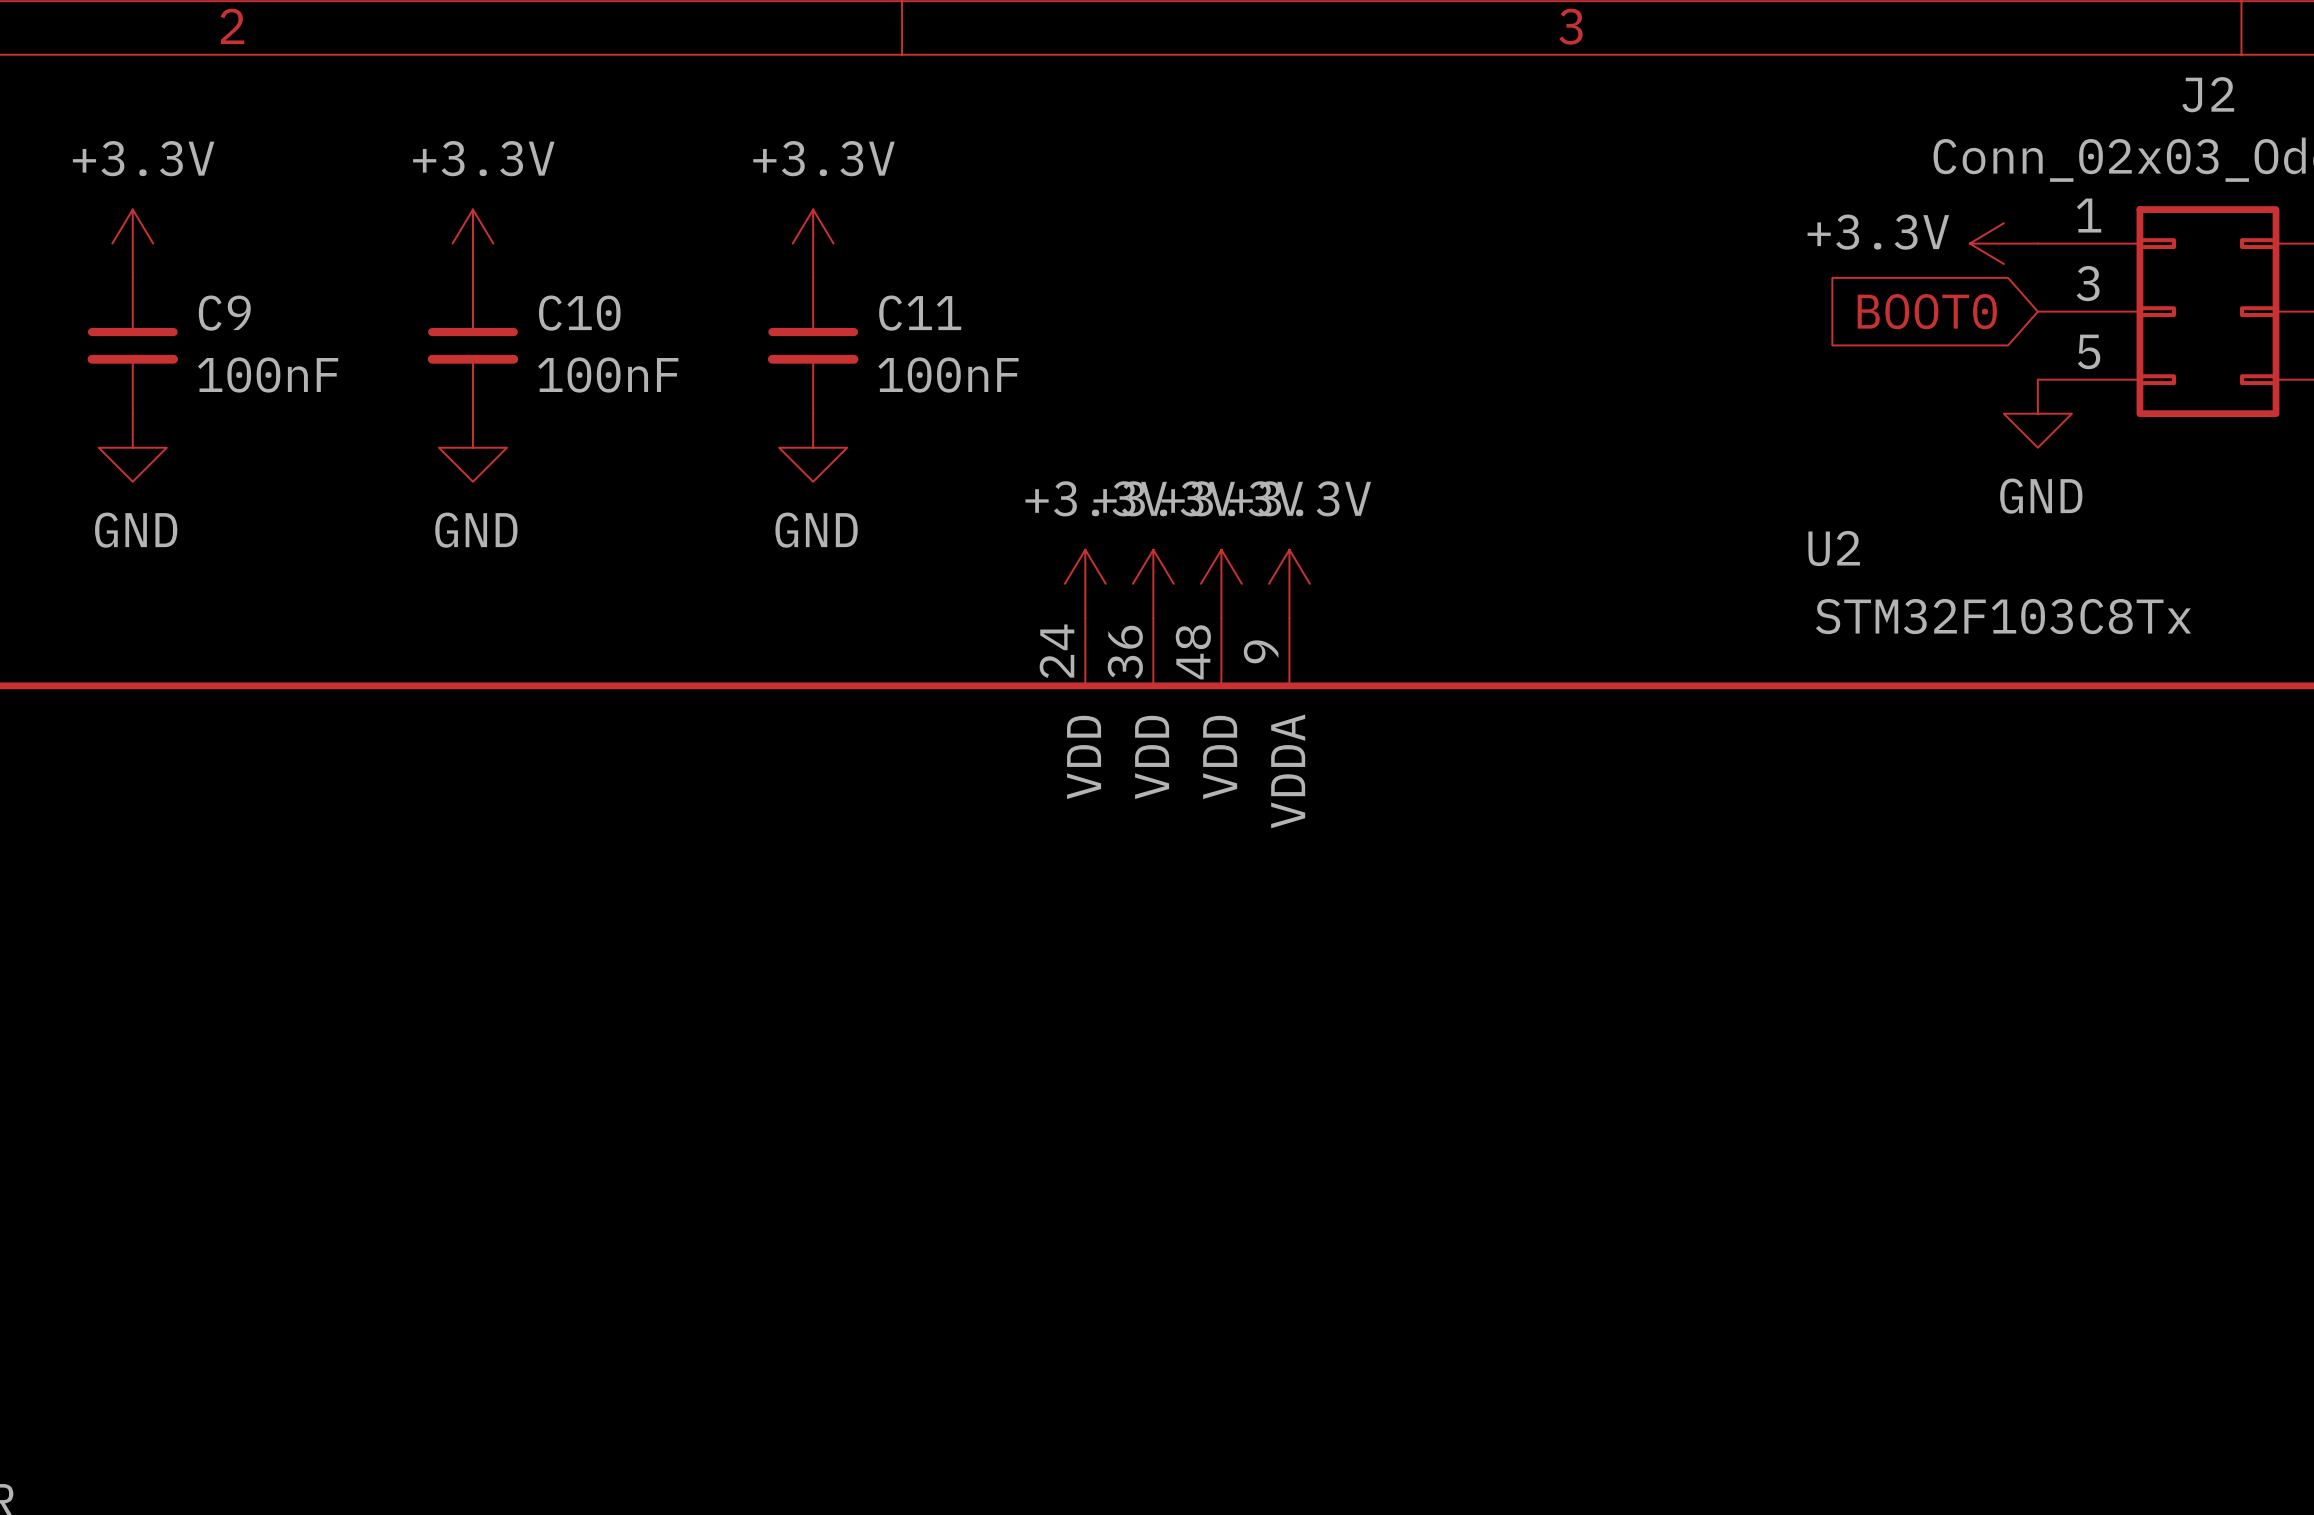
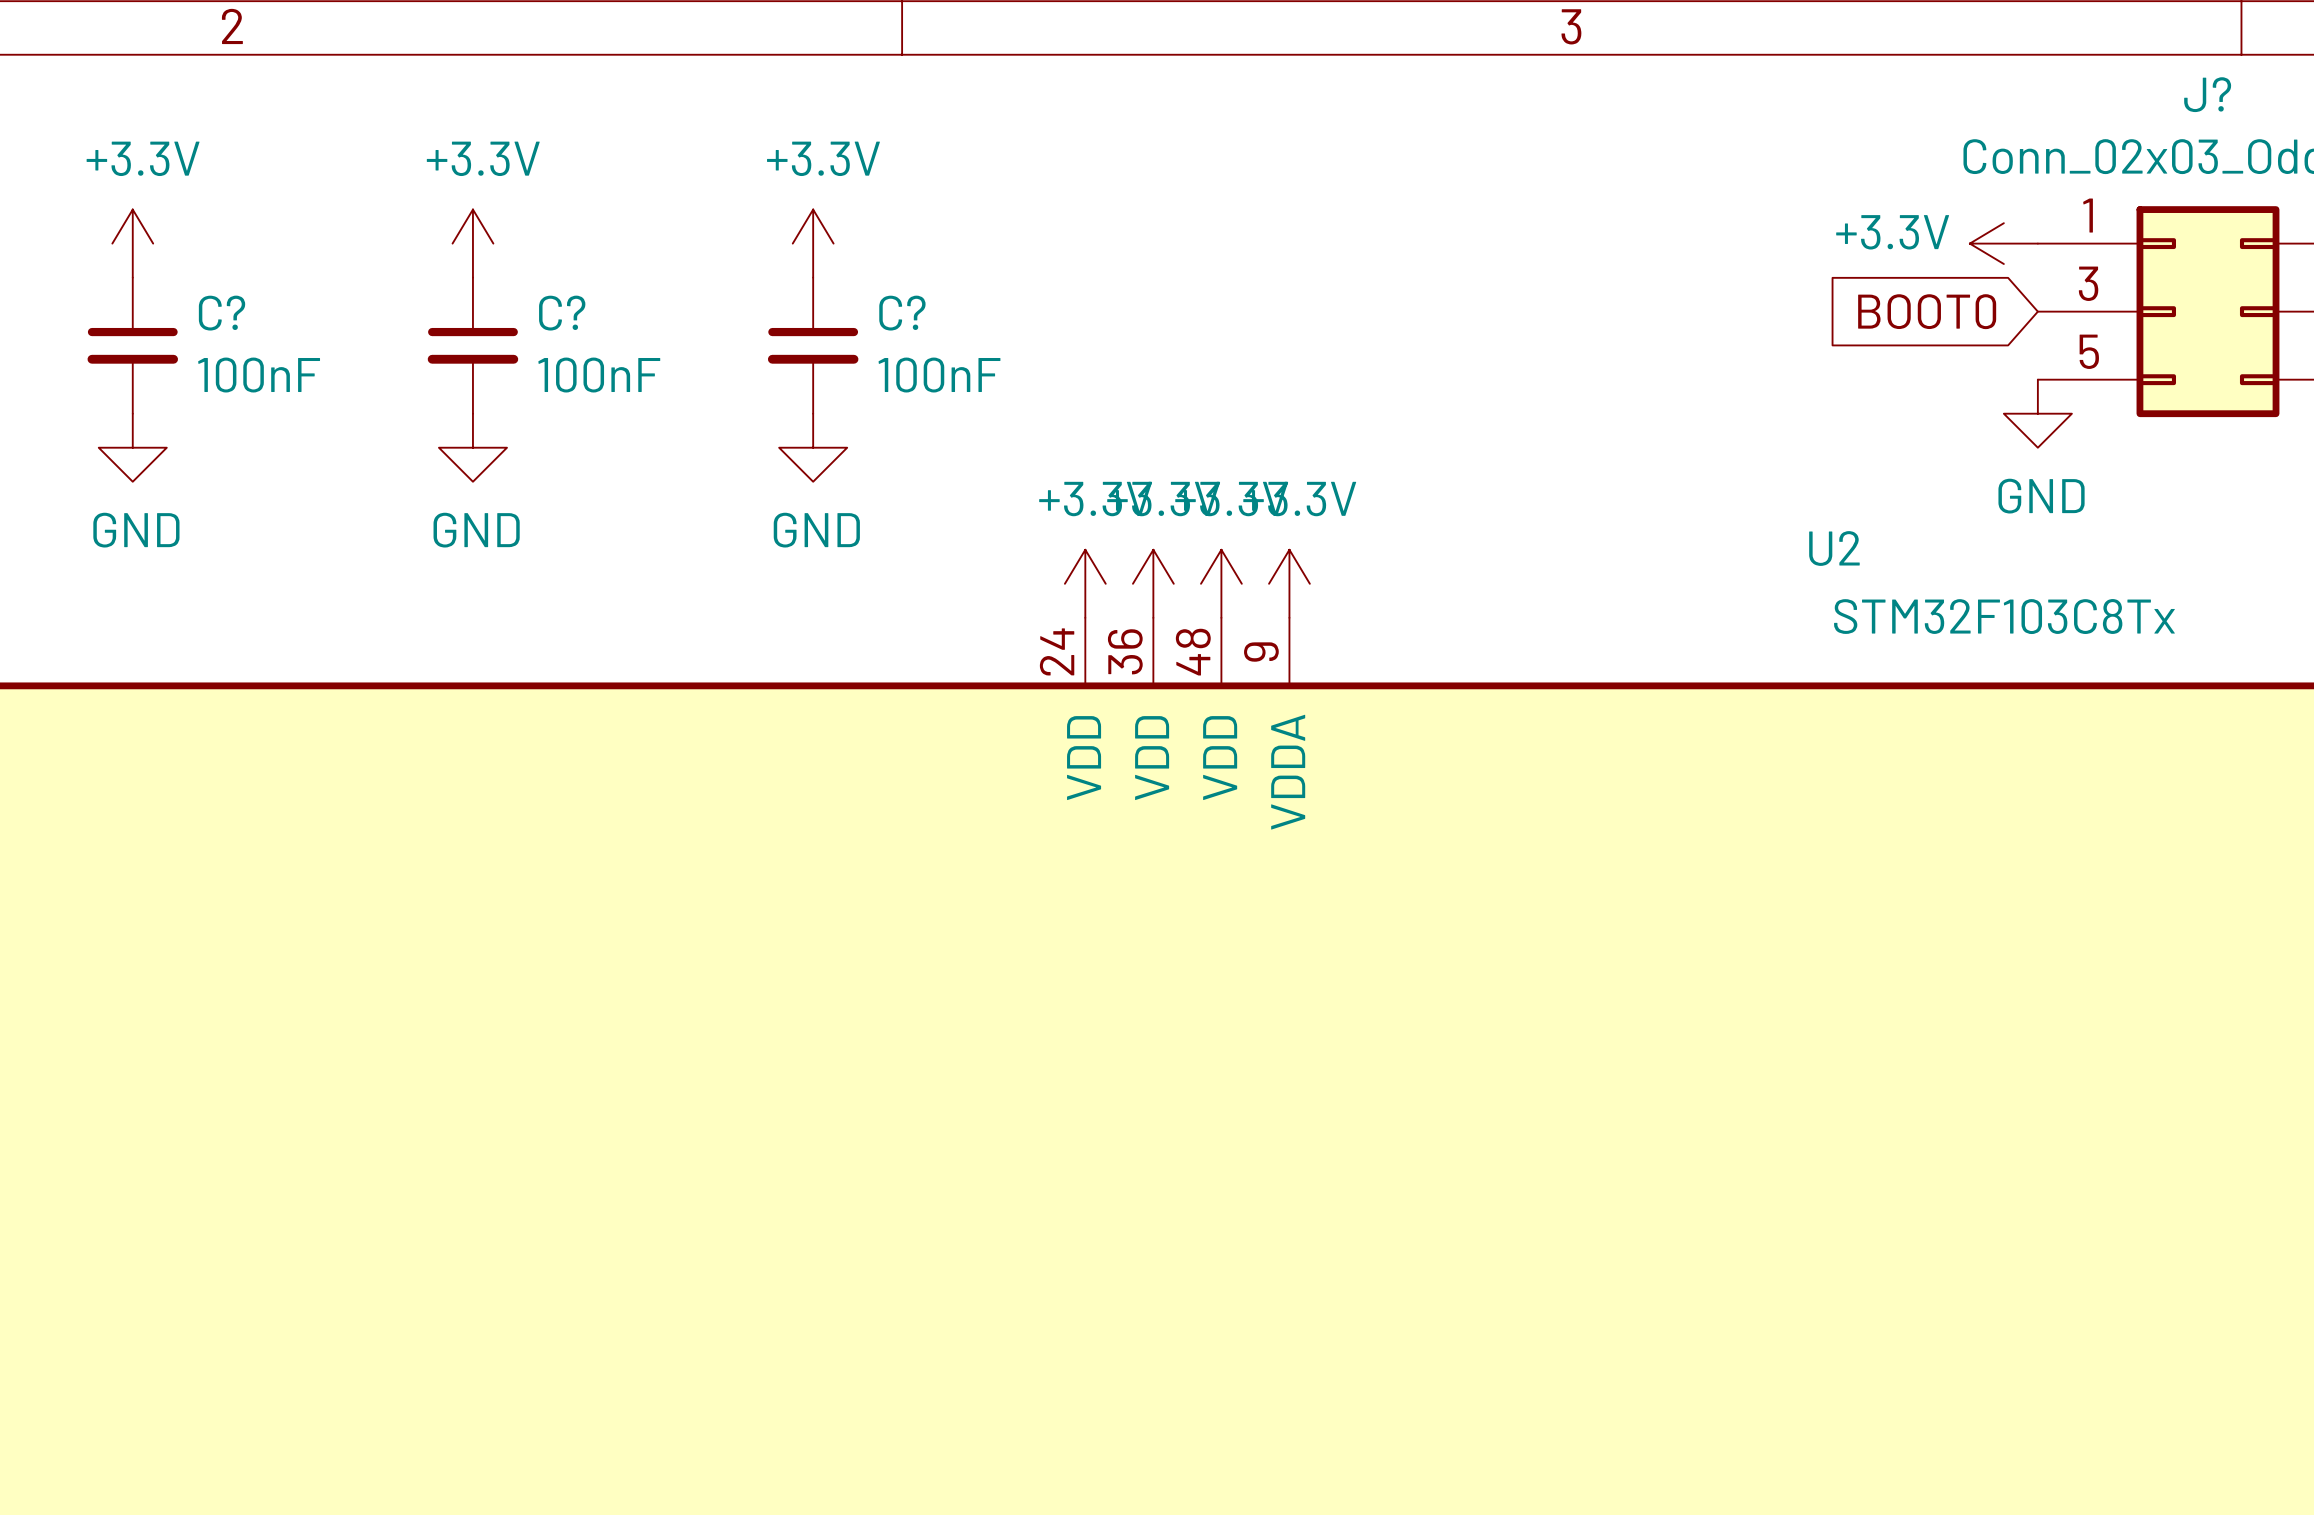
J2 name: J2 (2208, 94) -> J? (2207, 94)
C9 name: C9 (224, 313) -> C? (222, 313)
C10 name: C10 (579, 313) -> C? (562, 313)
C11 name: C11 (920, 313) -> C? (902, 313)

